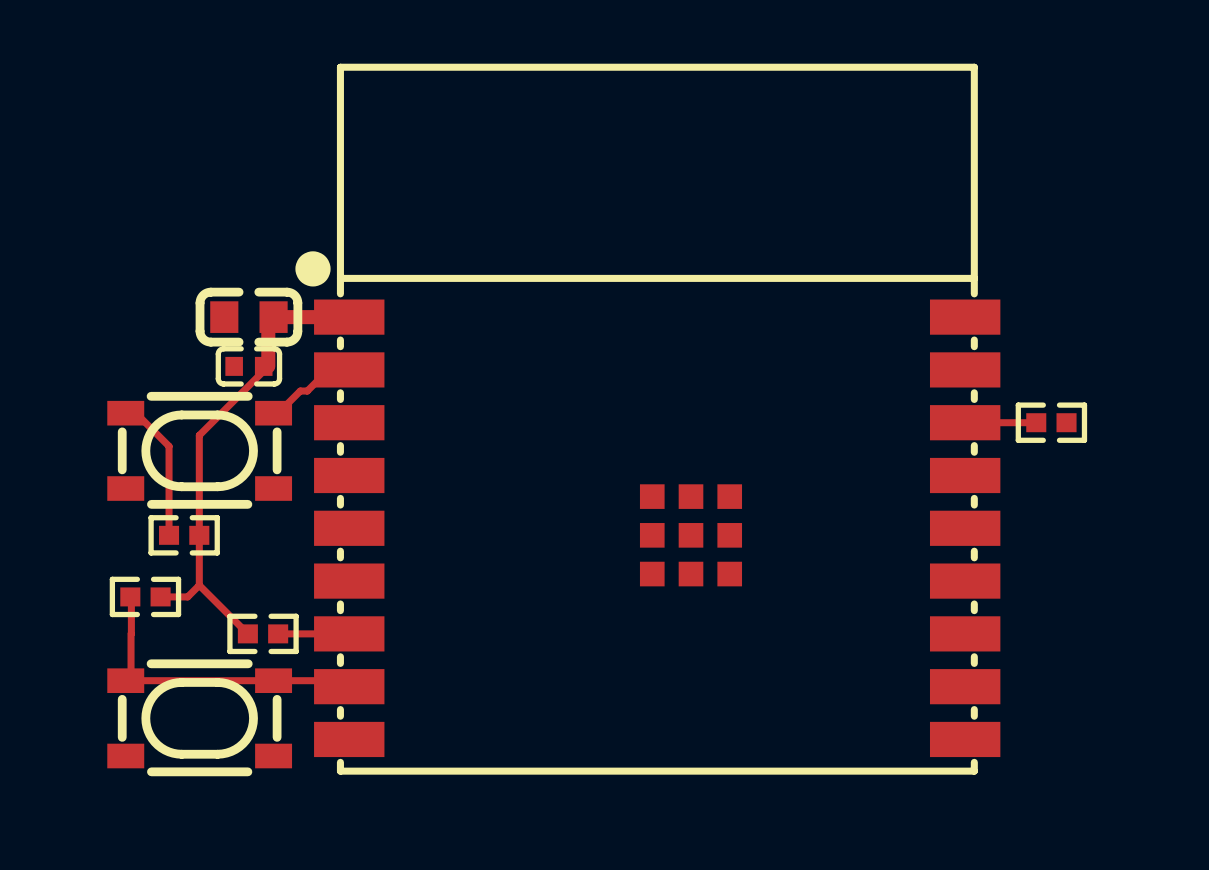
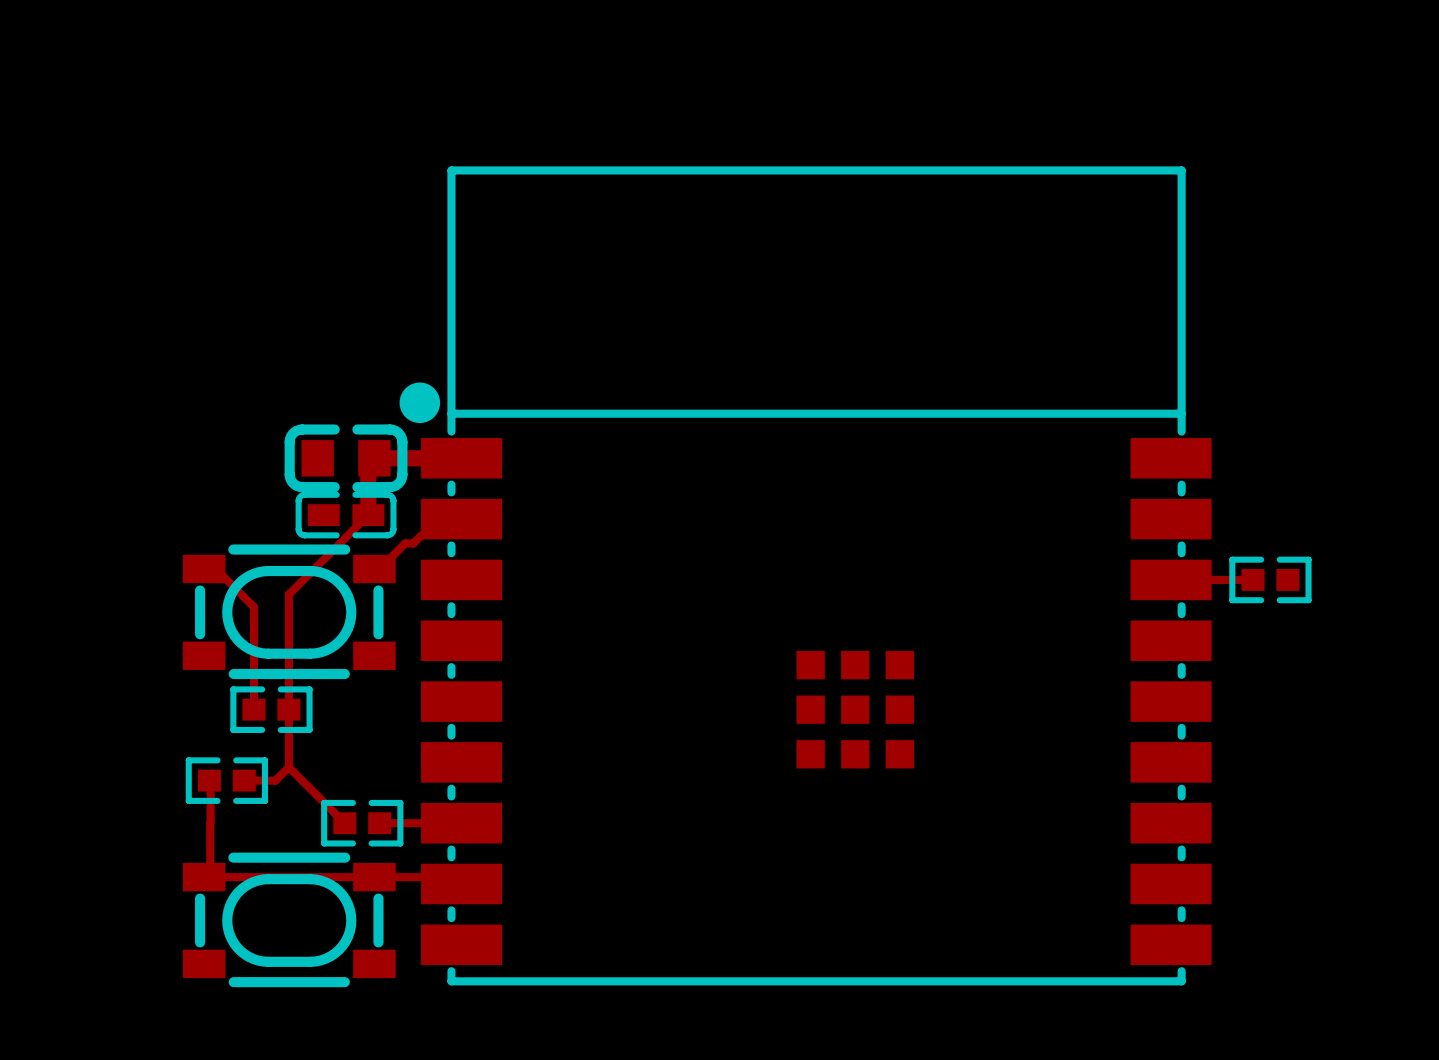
part footprint: [215, 346, 283, 387] -> [295, 491, 397, 539]

